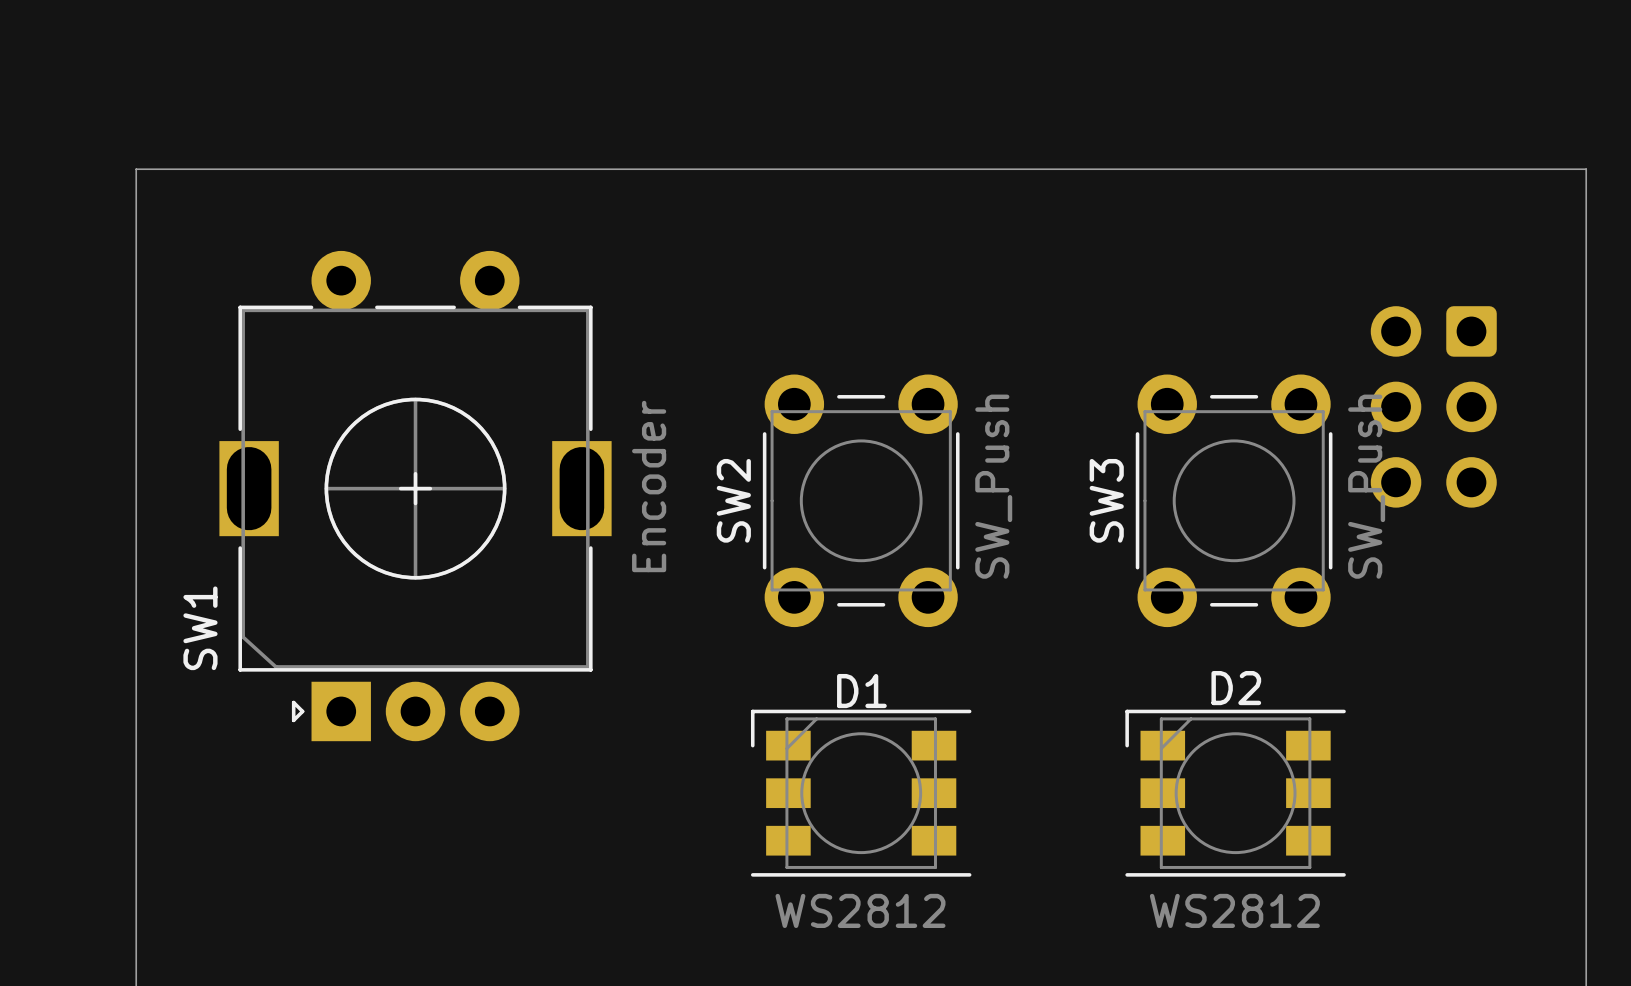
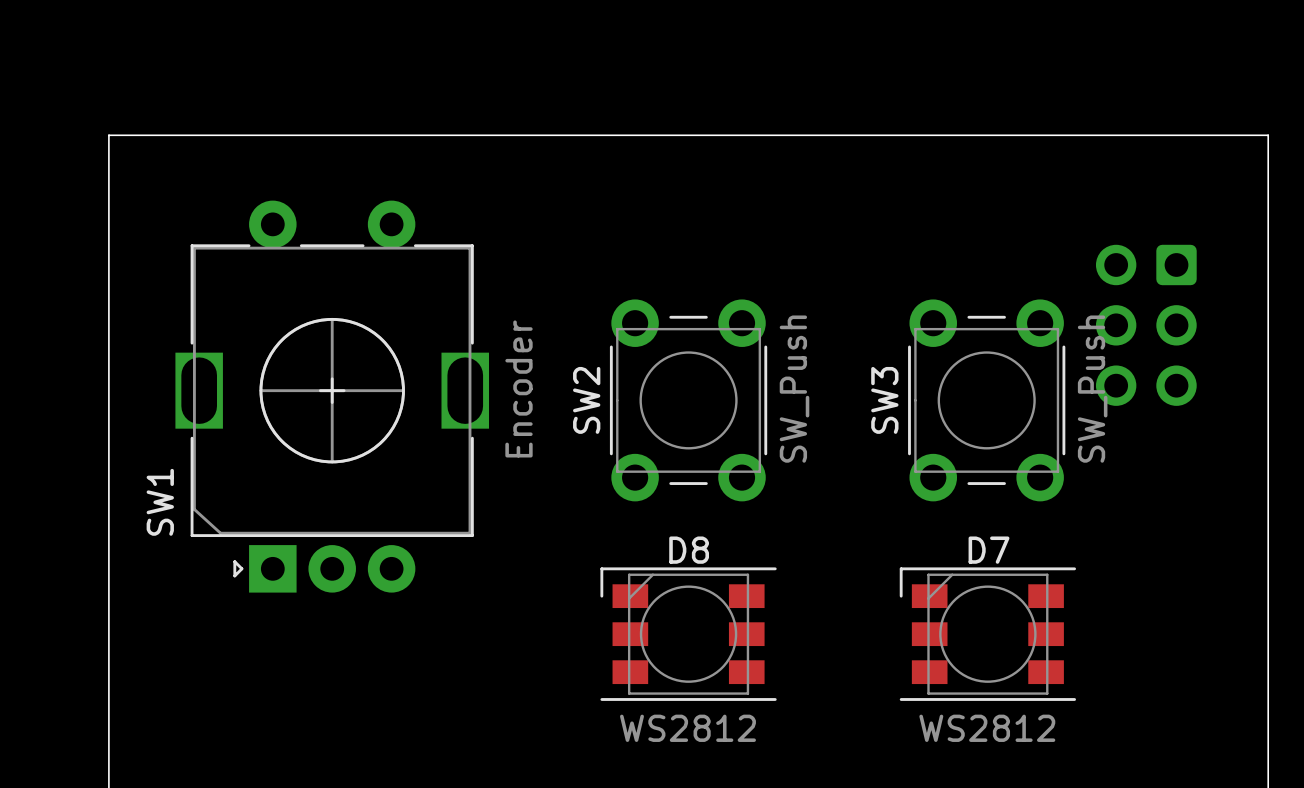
D2 name: D2 (1236, 688) -> D7 (989, 550)
D1 name: D1 (861, 691) -> D8 (689, 550)

